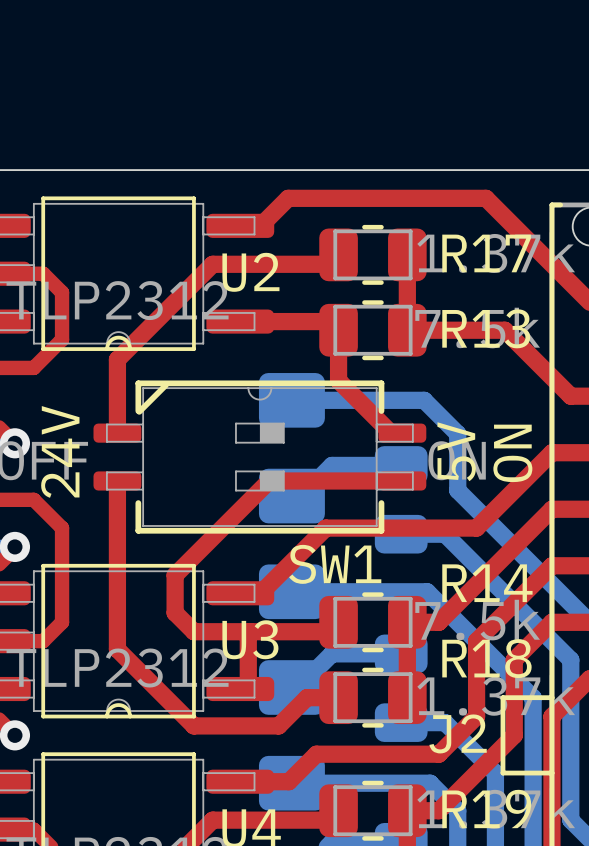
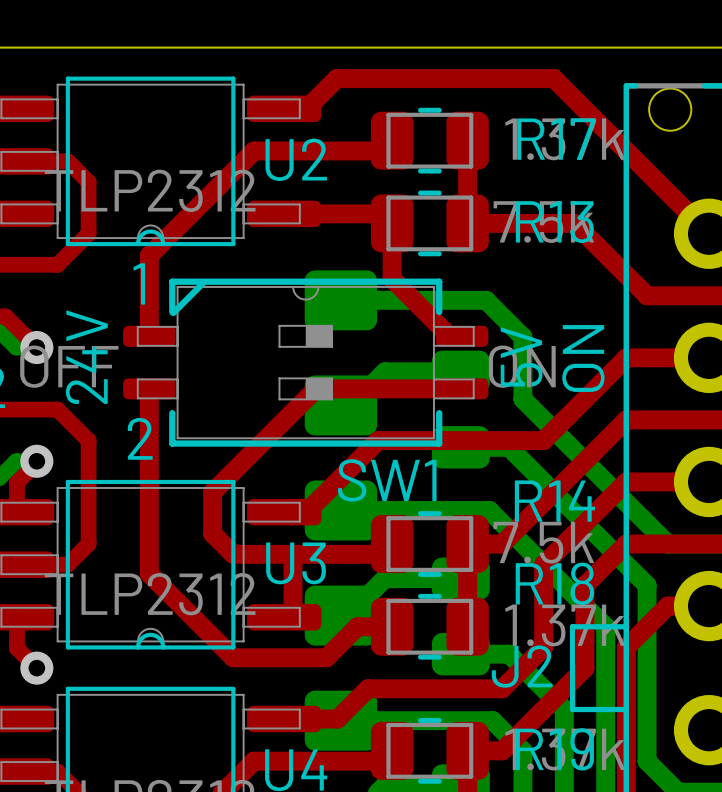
text: none -> 1 (139, 283)
text: none -> 2 (140, 438)

